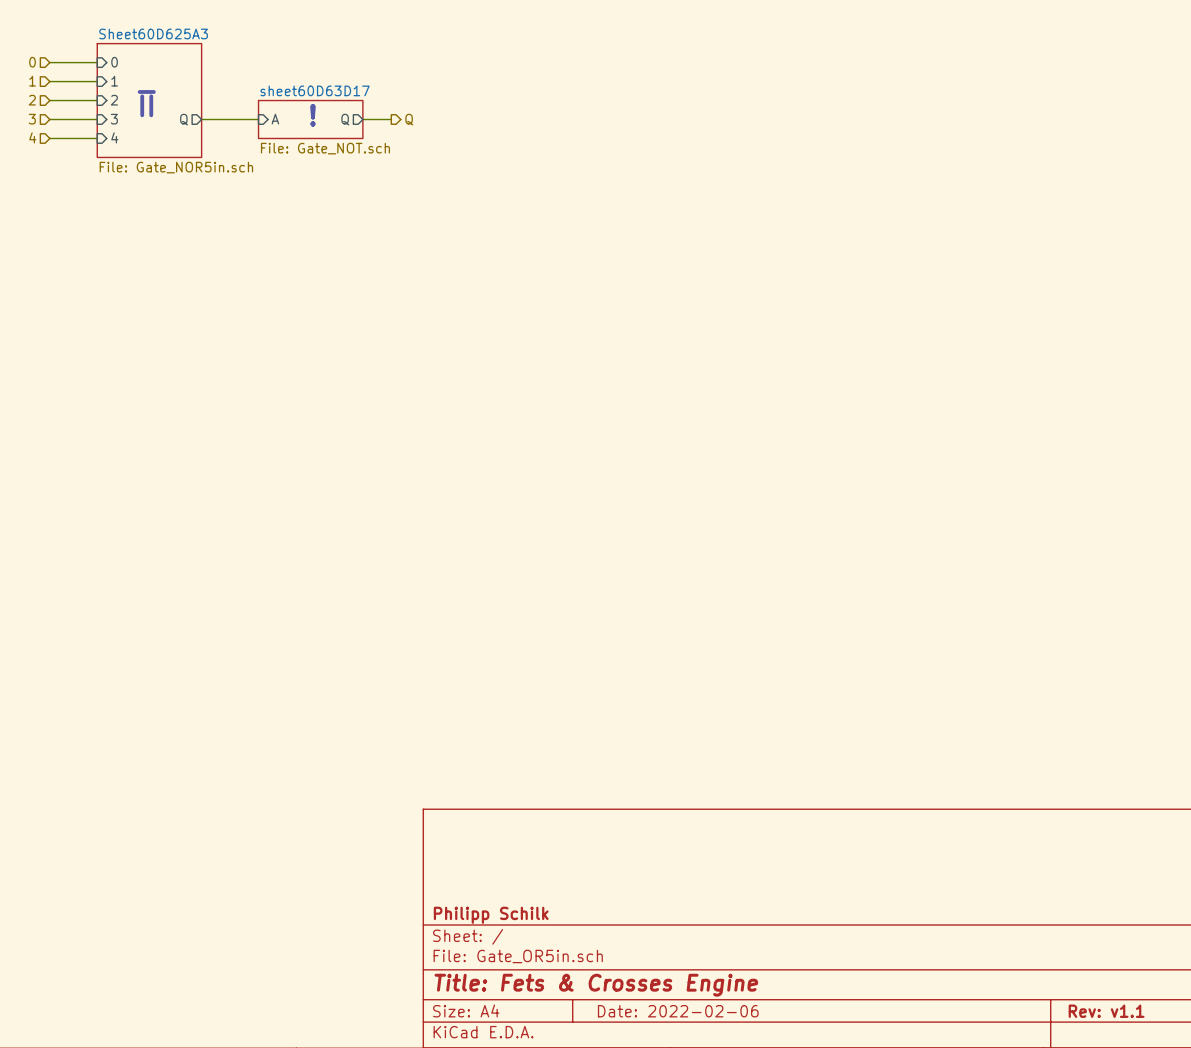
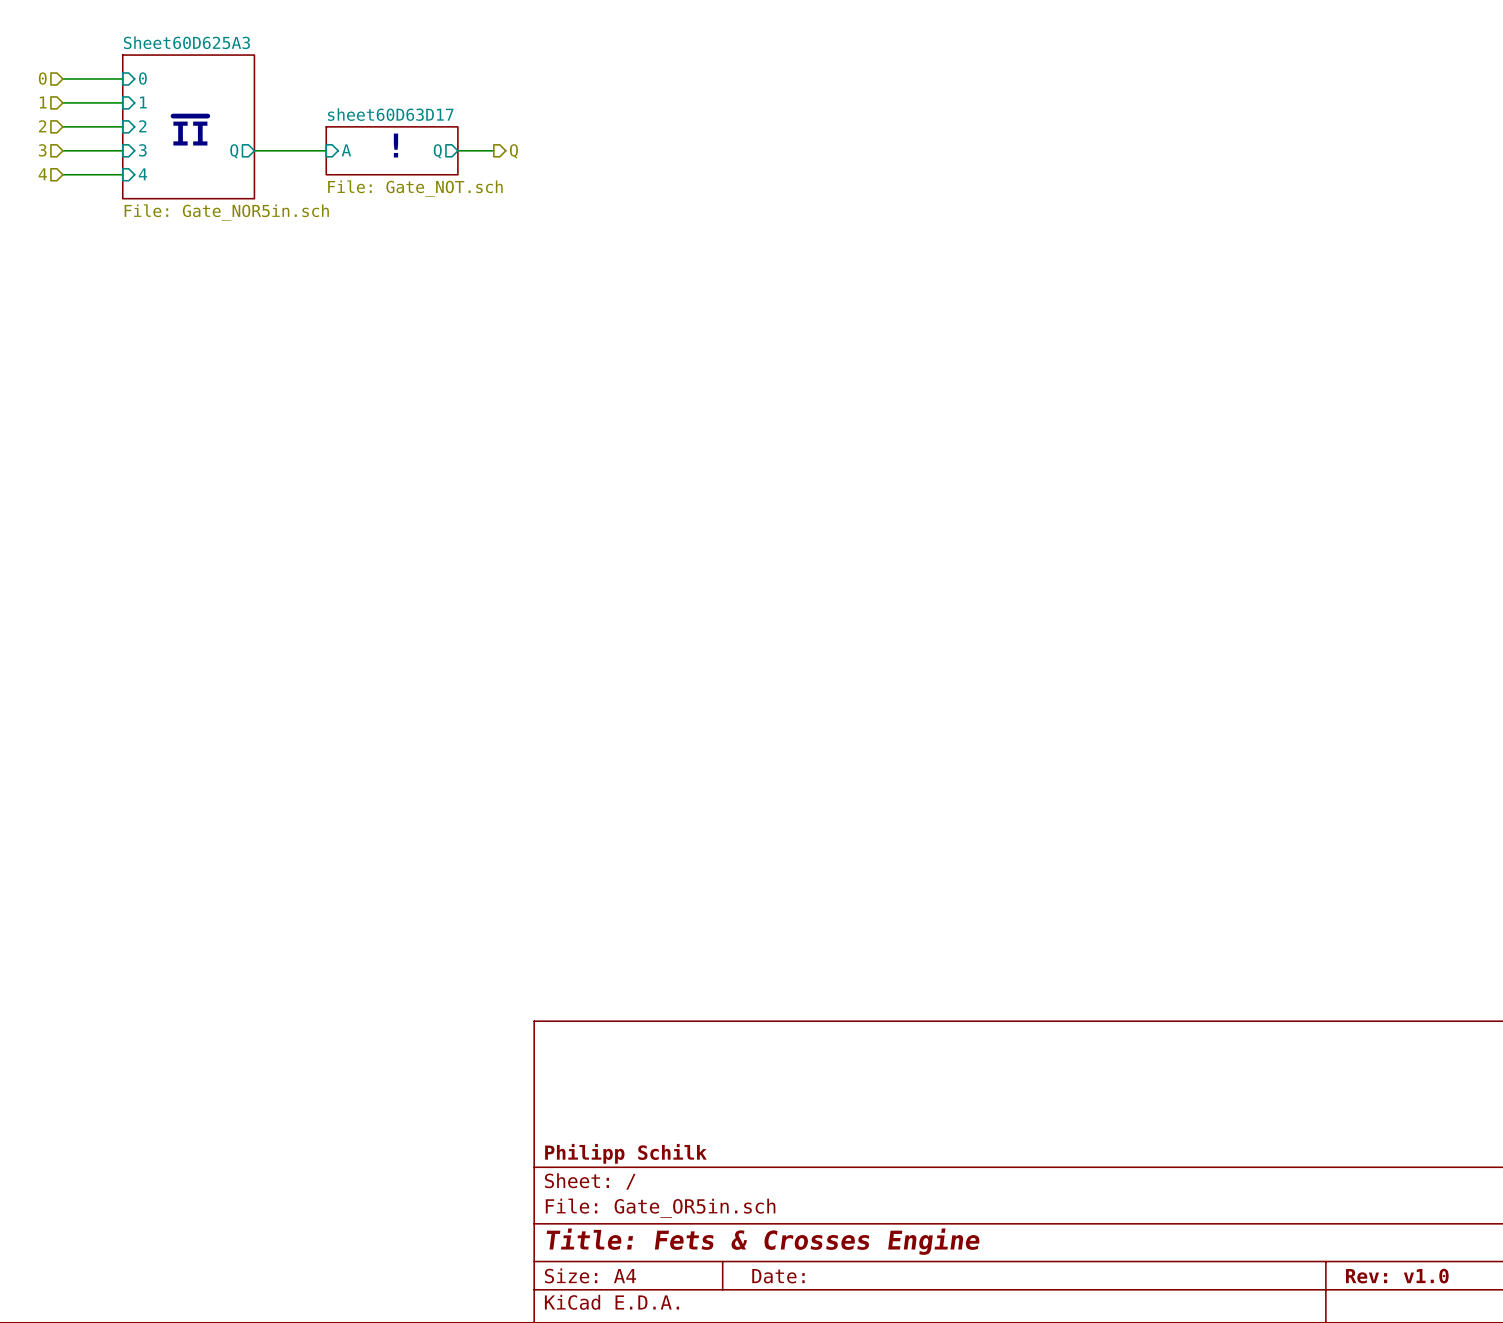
title block: Date: 2022-02-06 (678, 1011) -> Date: (778, 1276)
title block: Rev: v1.1 (1106, 1011) -> Rev: v1.0 (1397, 1276)

